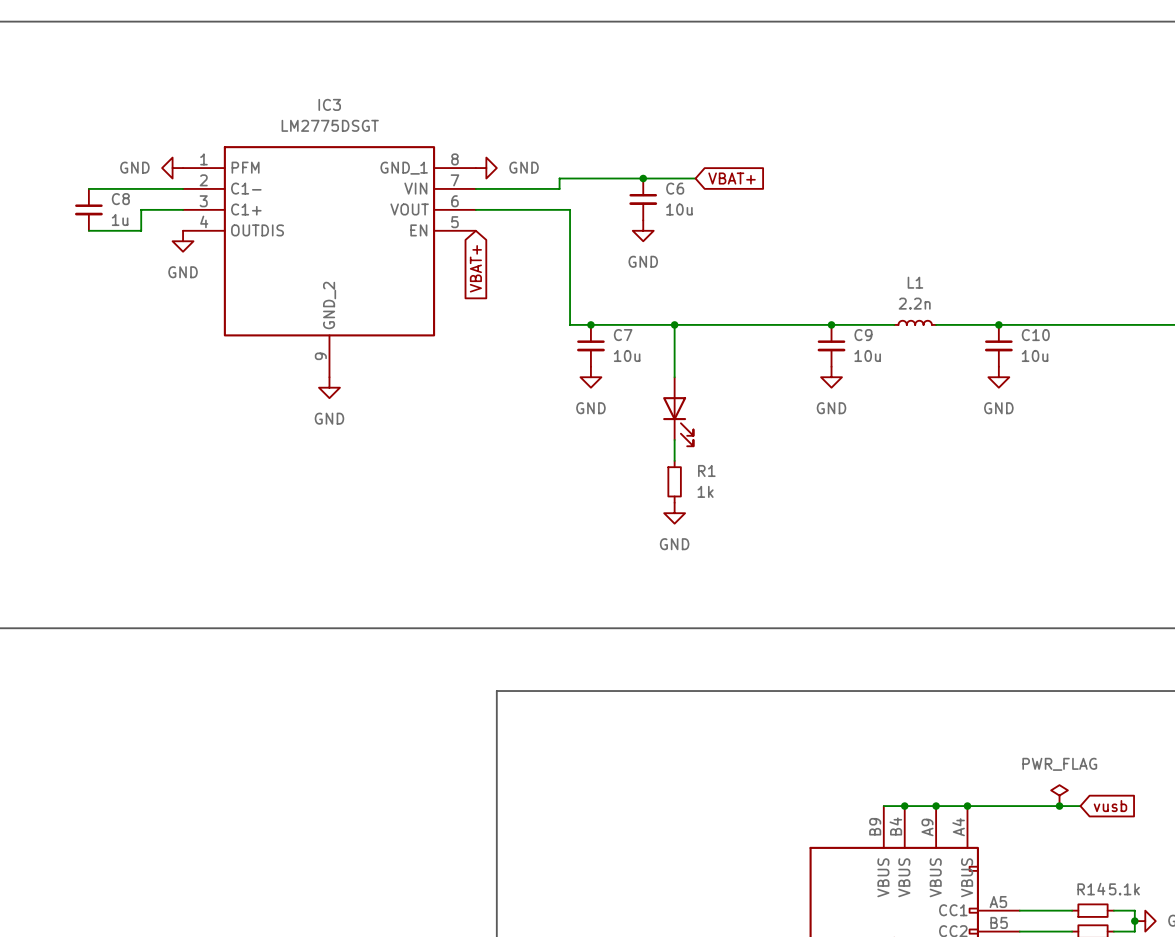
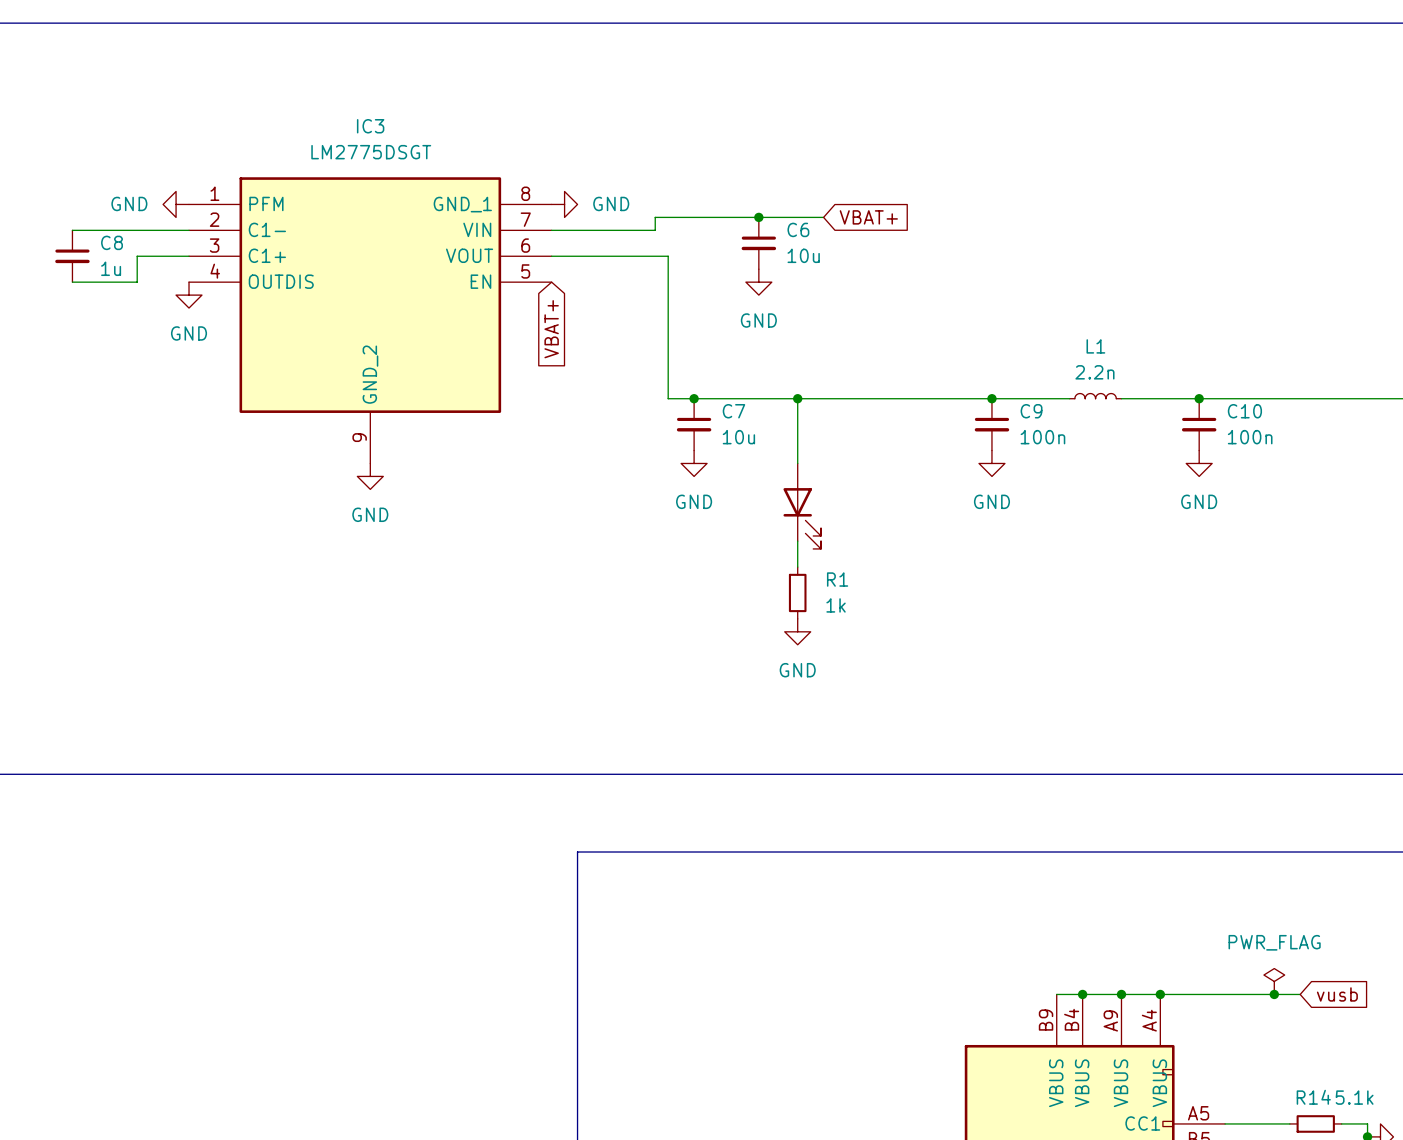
C9 value: 10u (867, 355) -> 100n (1042, 437)
C10 value: 10u (1035, 355) -> 100n (1250, 437)

